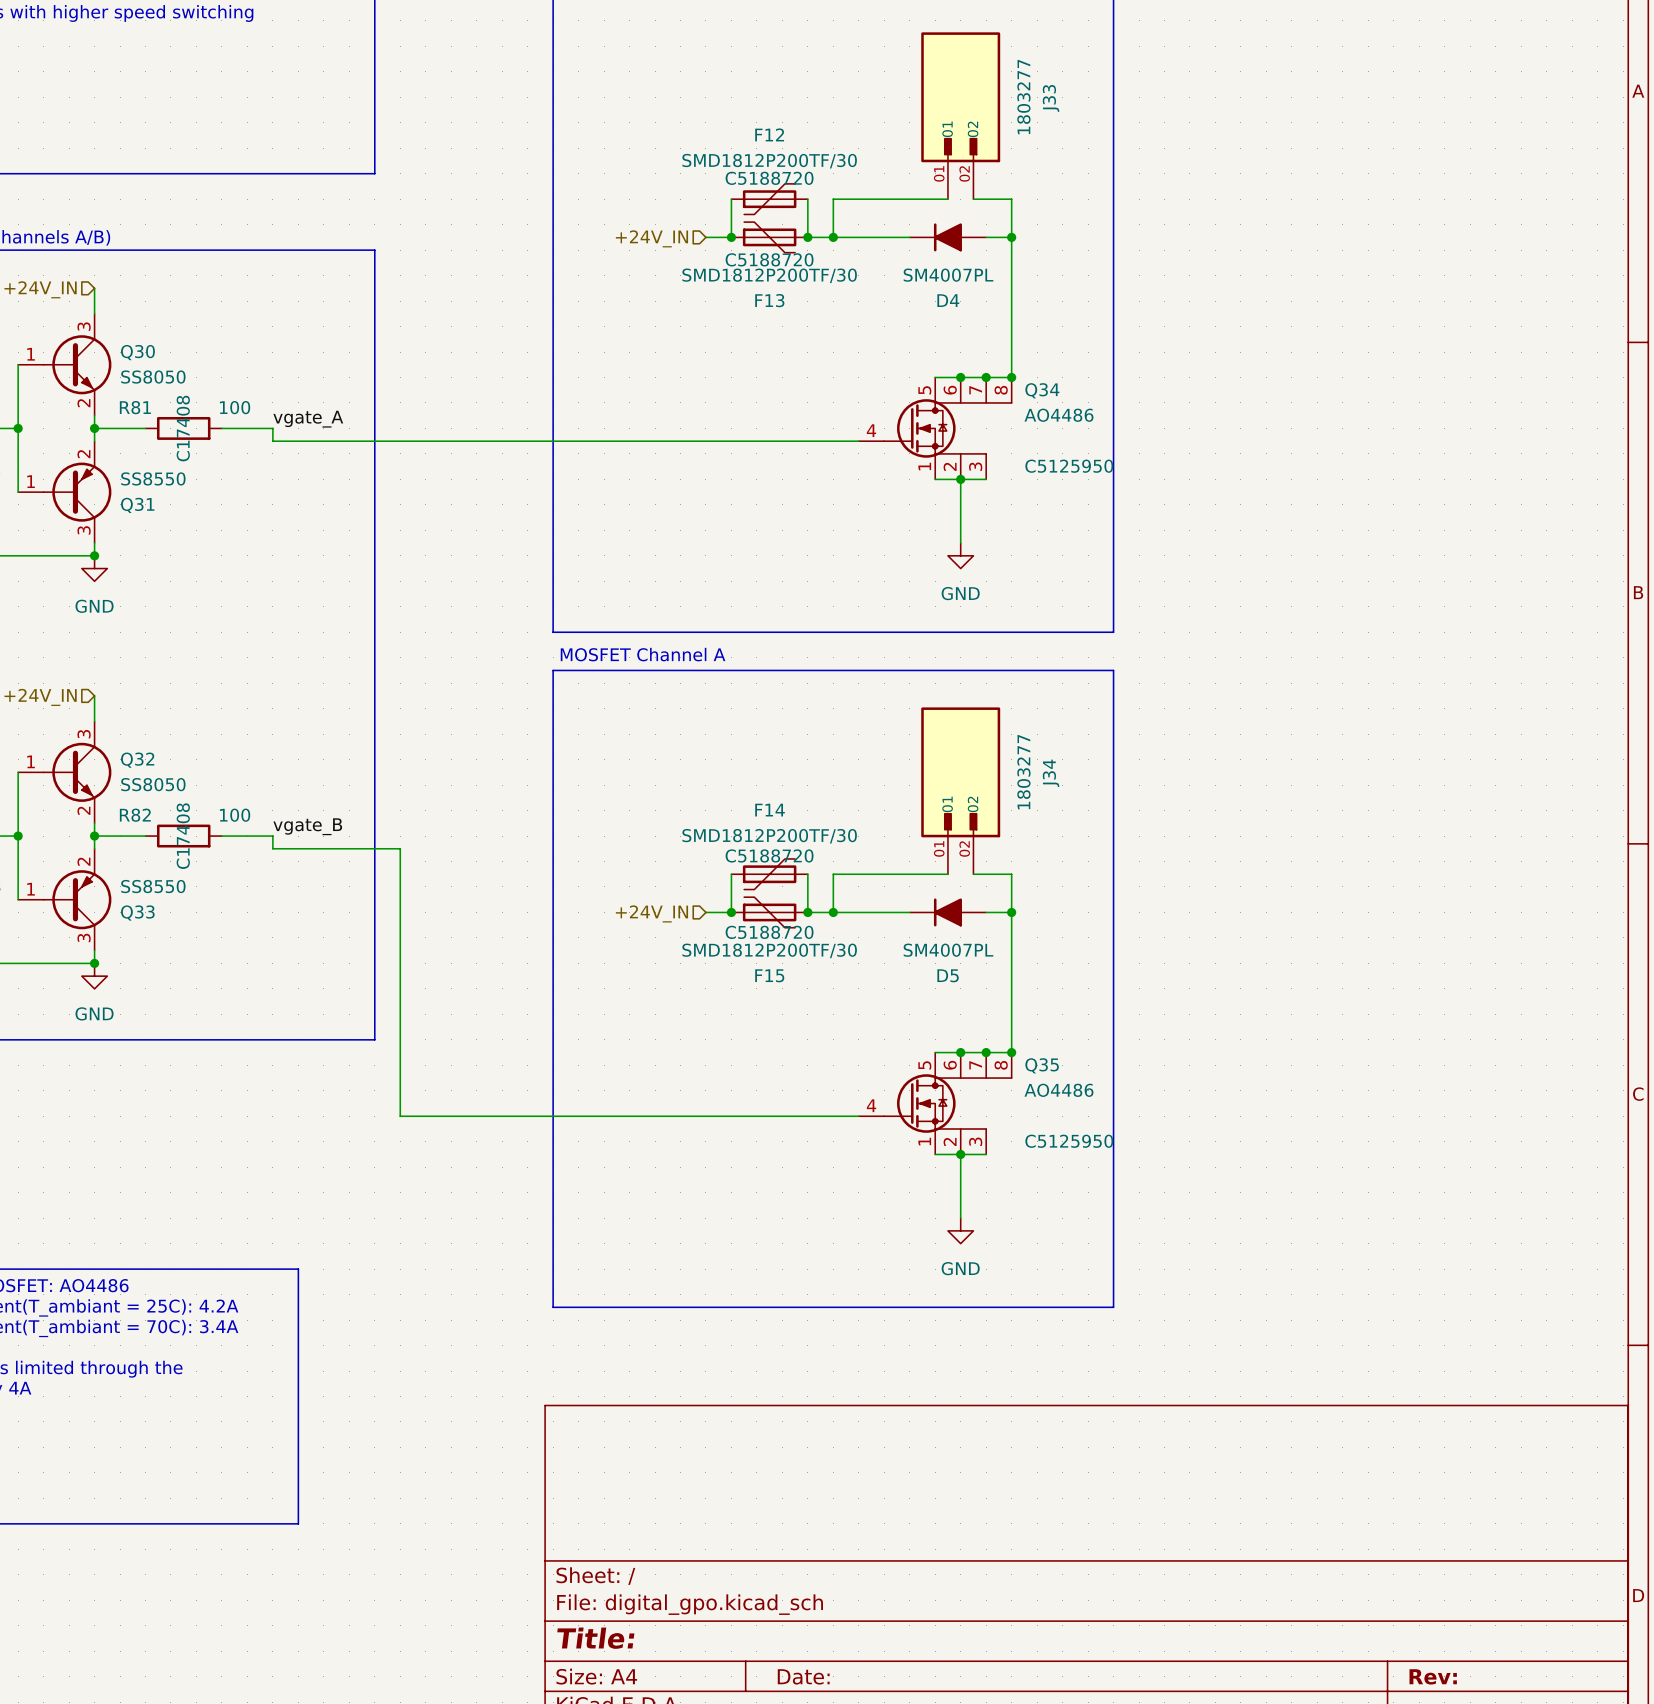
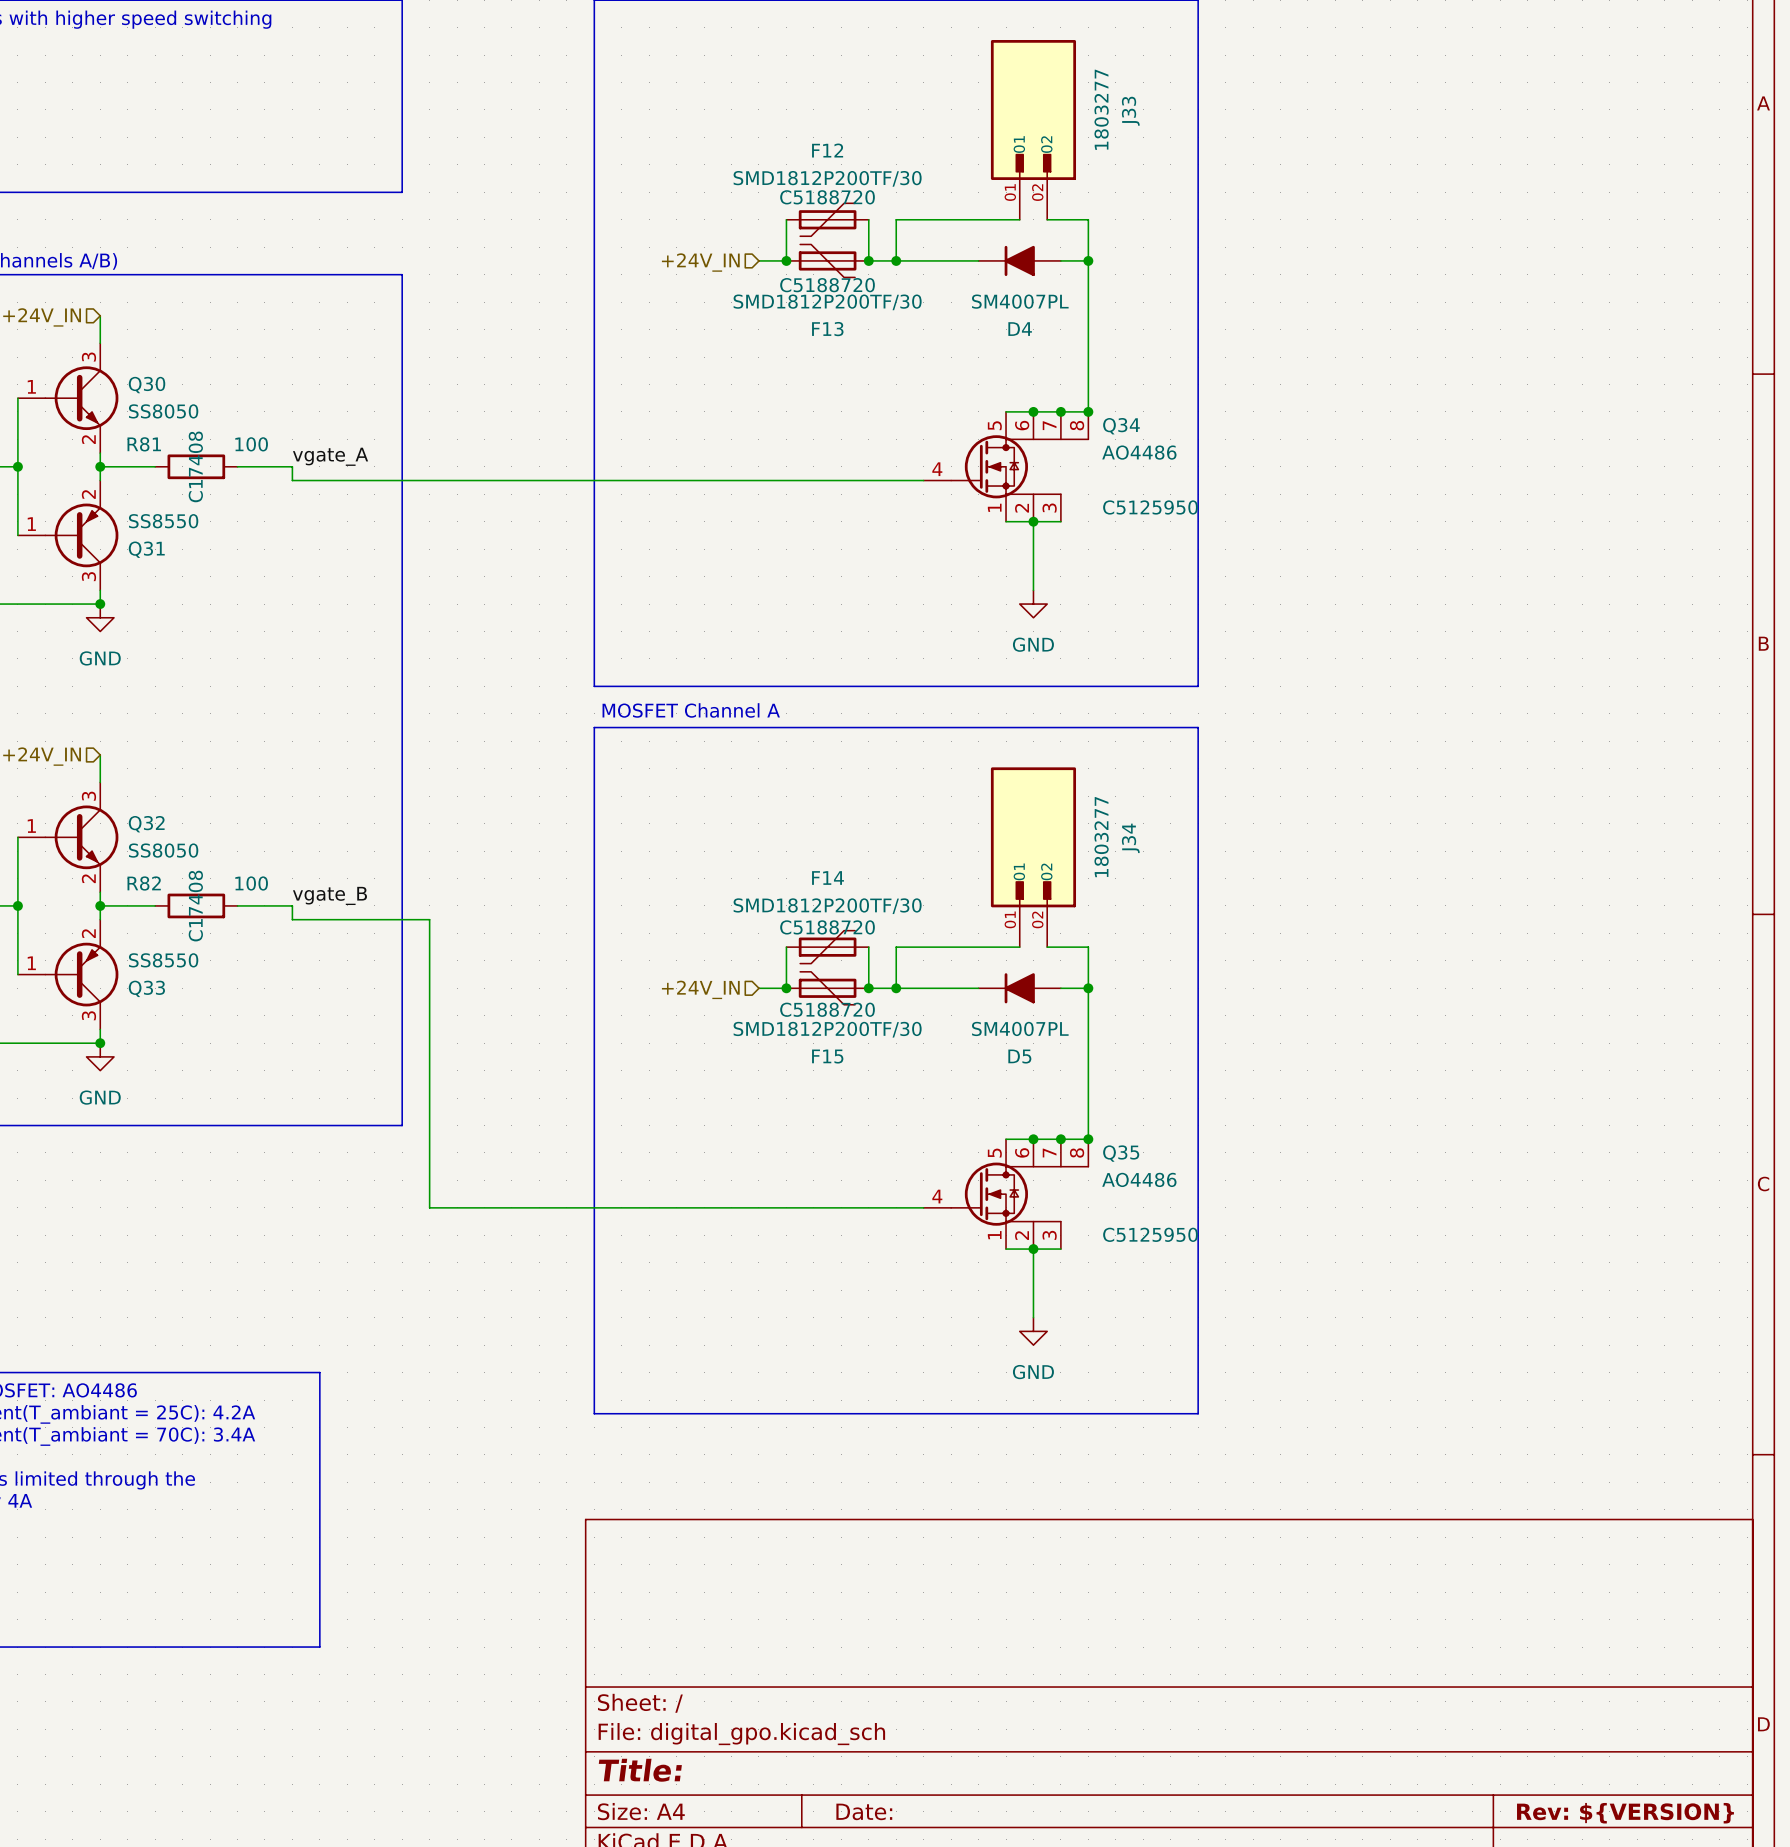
title block: Rev: (1433, 1676) -> Rev: ${VERSION} (1625, 1813)

